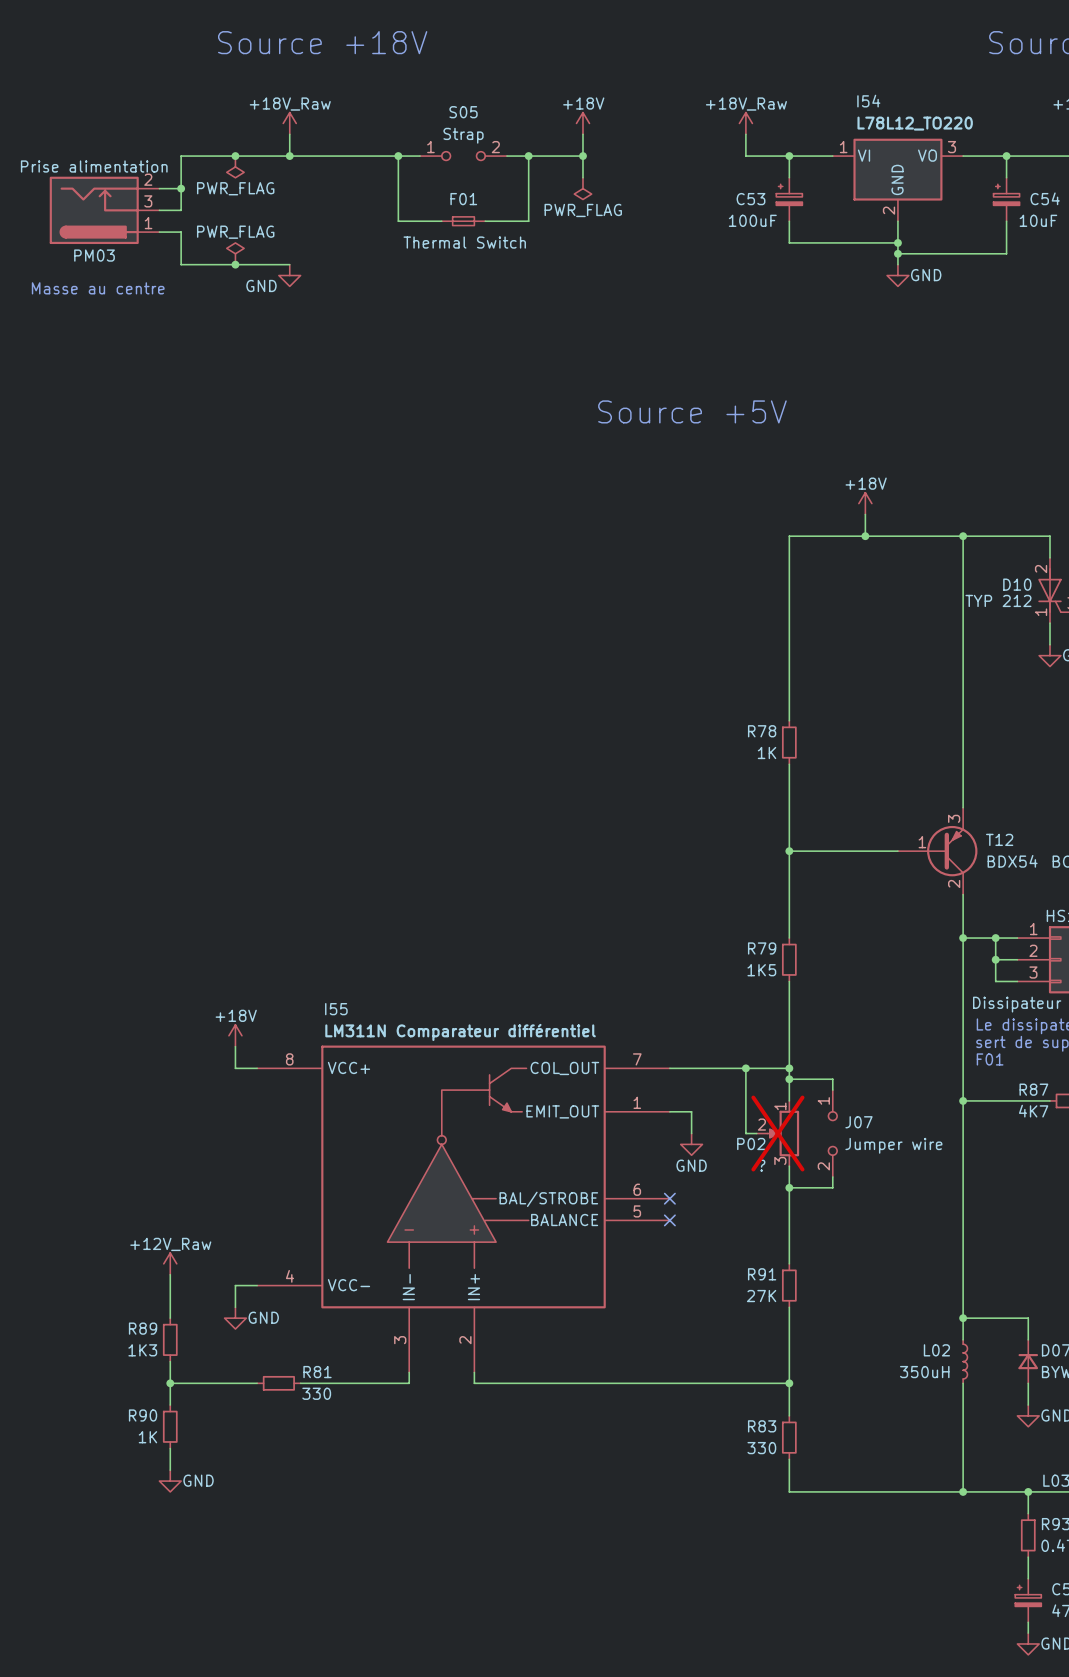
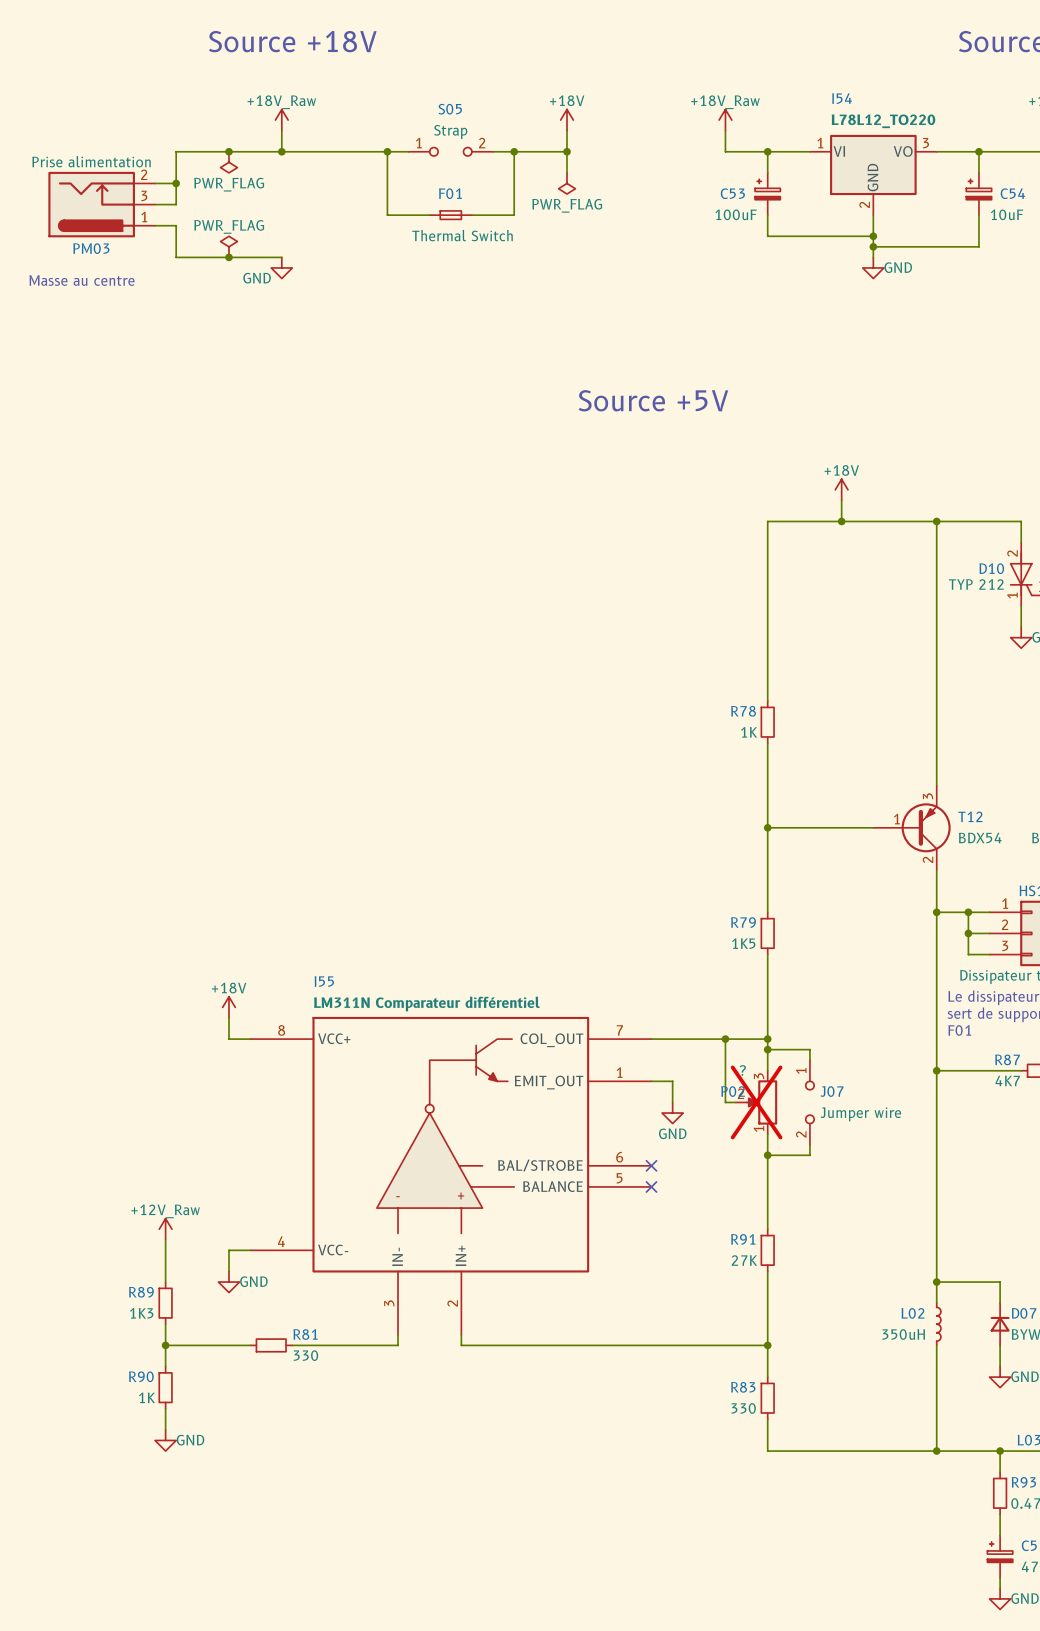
P02 flip: as is (783, 1133) -> up-down (761, 1102)

